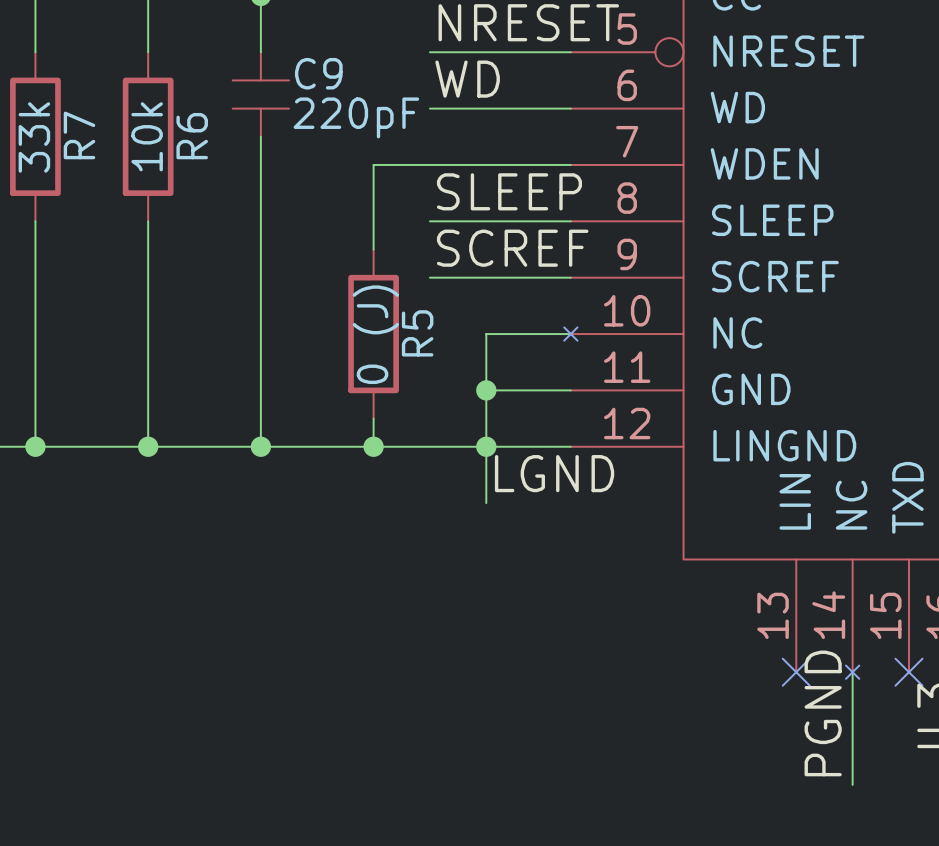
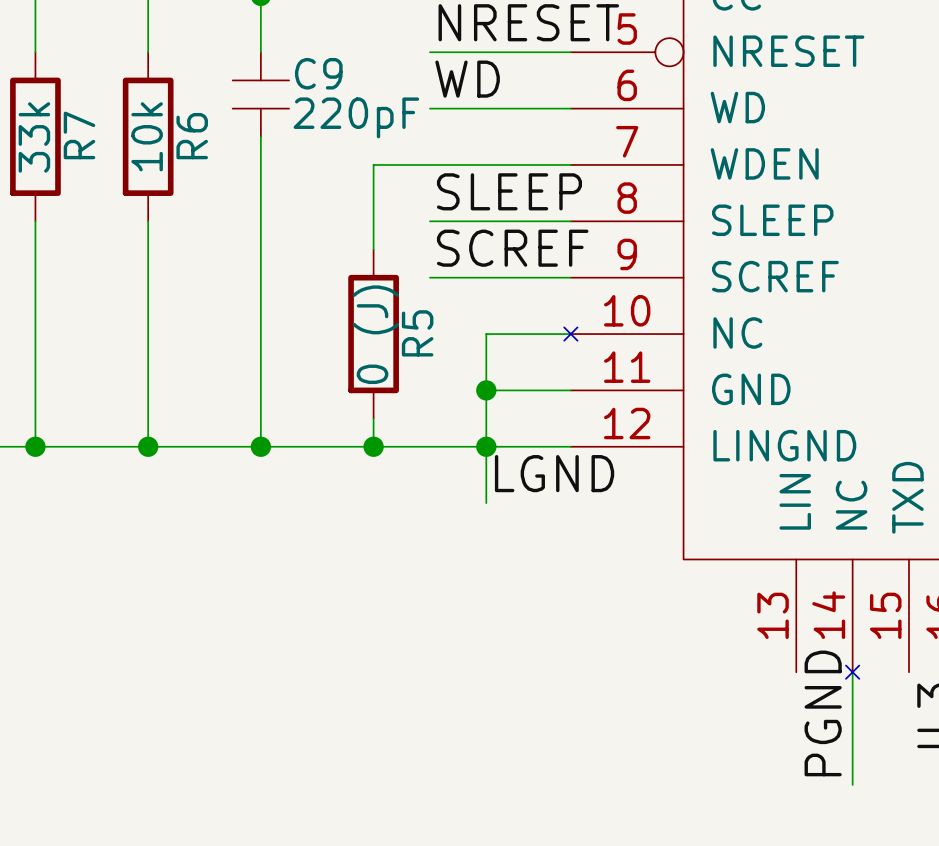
no-connect mark: (796, 672) -> none
no-connect mark: (908, 672) -> none

